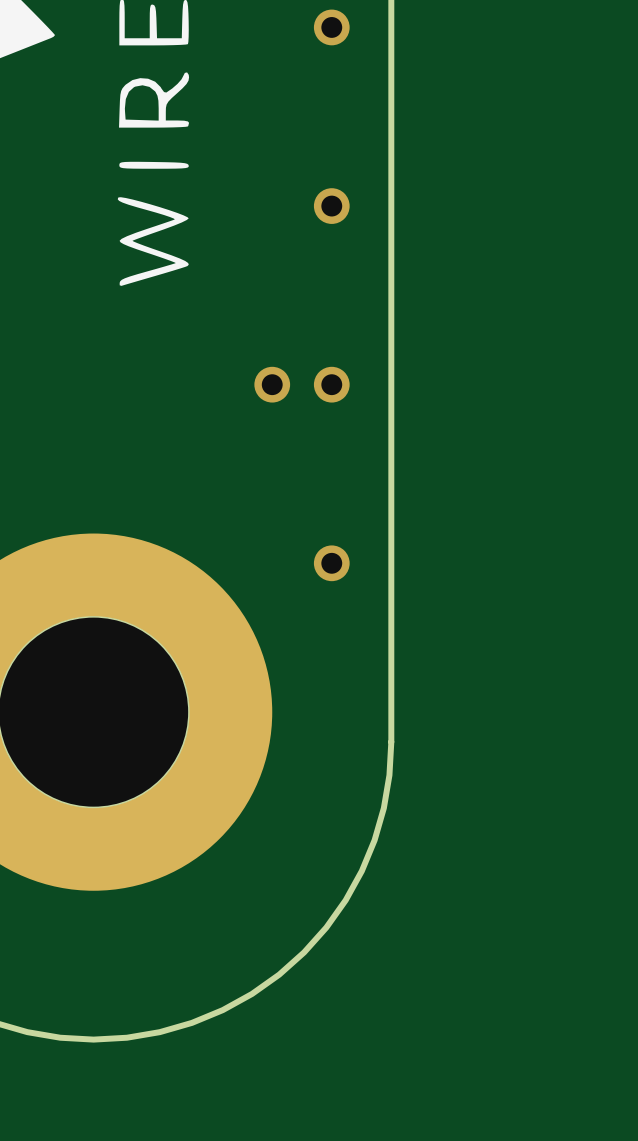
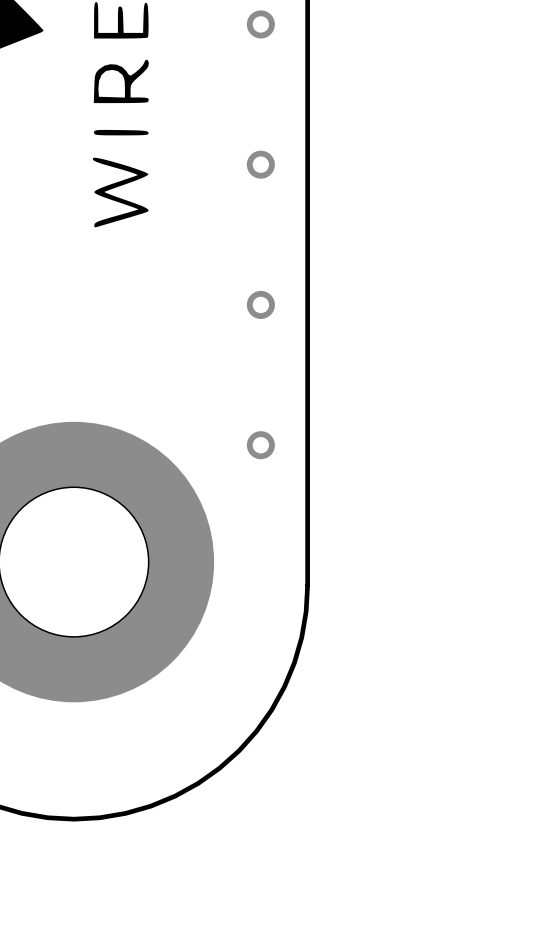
via: (272, 384) -> none

